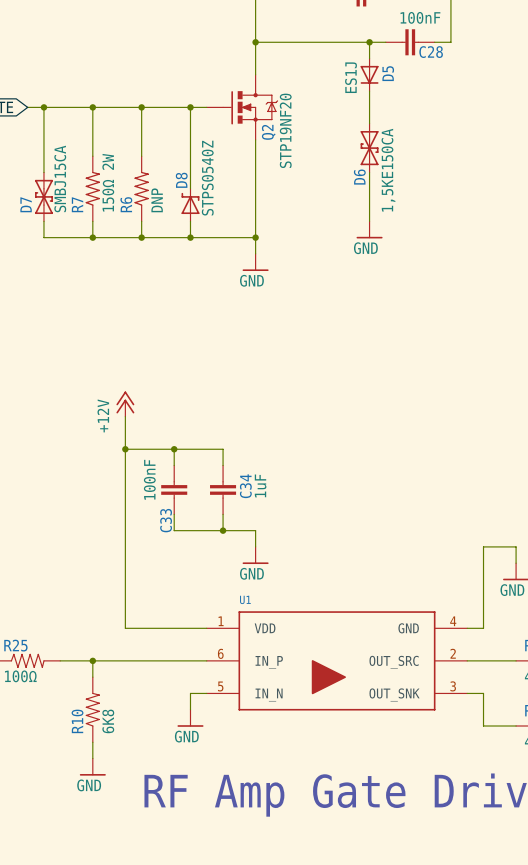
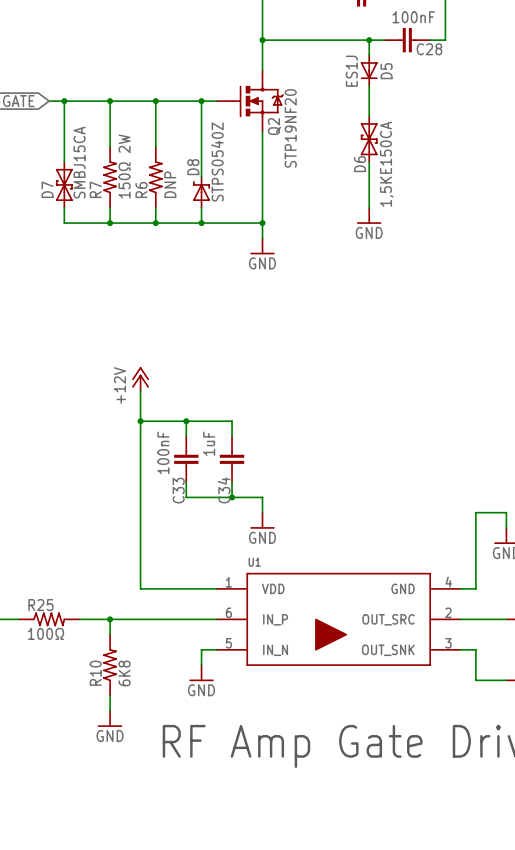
C34 value position: 1uF (260, 485) -> 1uF (209, 443)
C34 name position: C34 (245, 486) -> C34 (224, 490)

